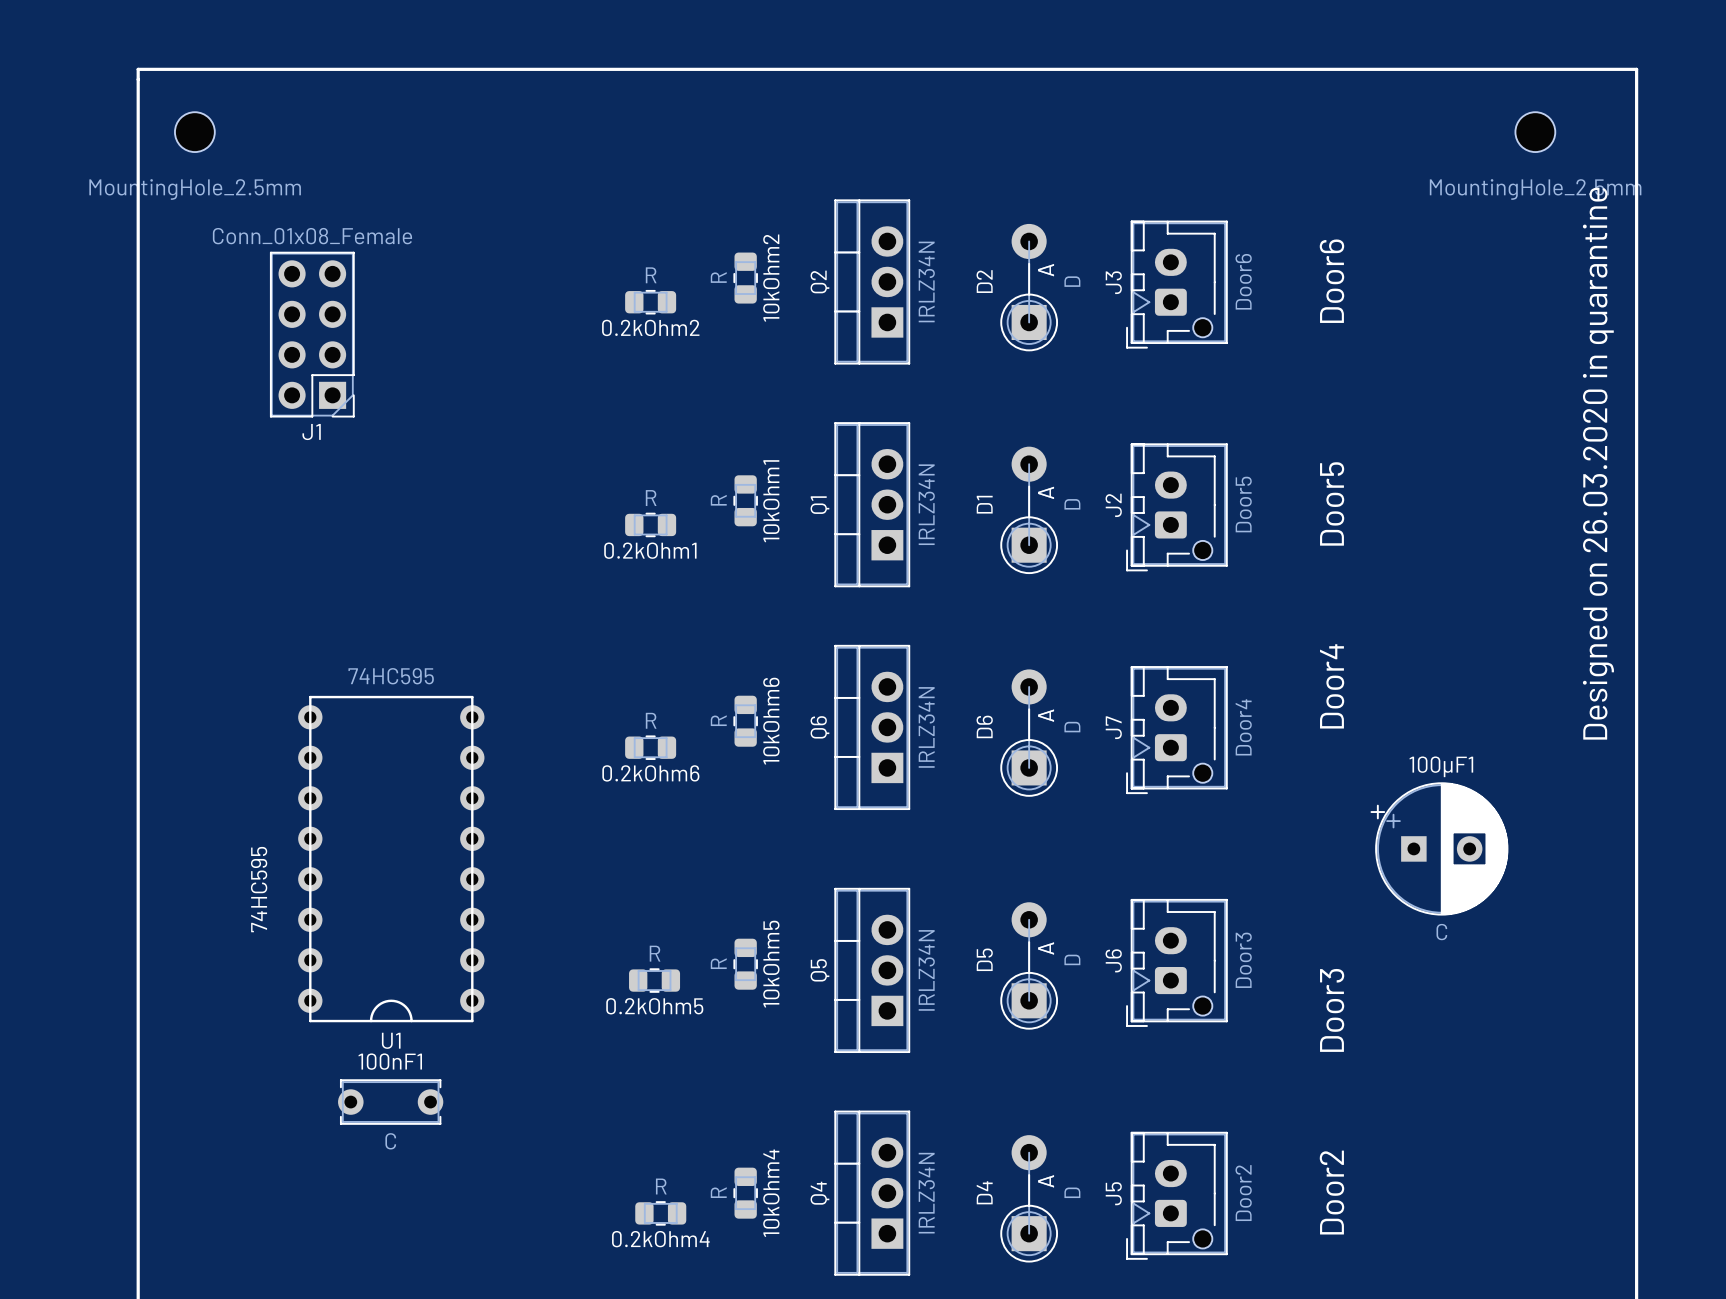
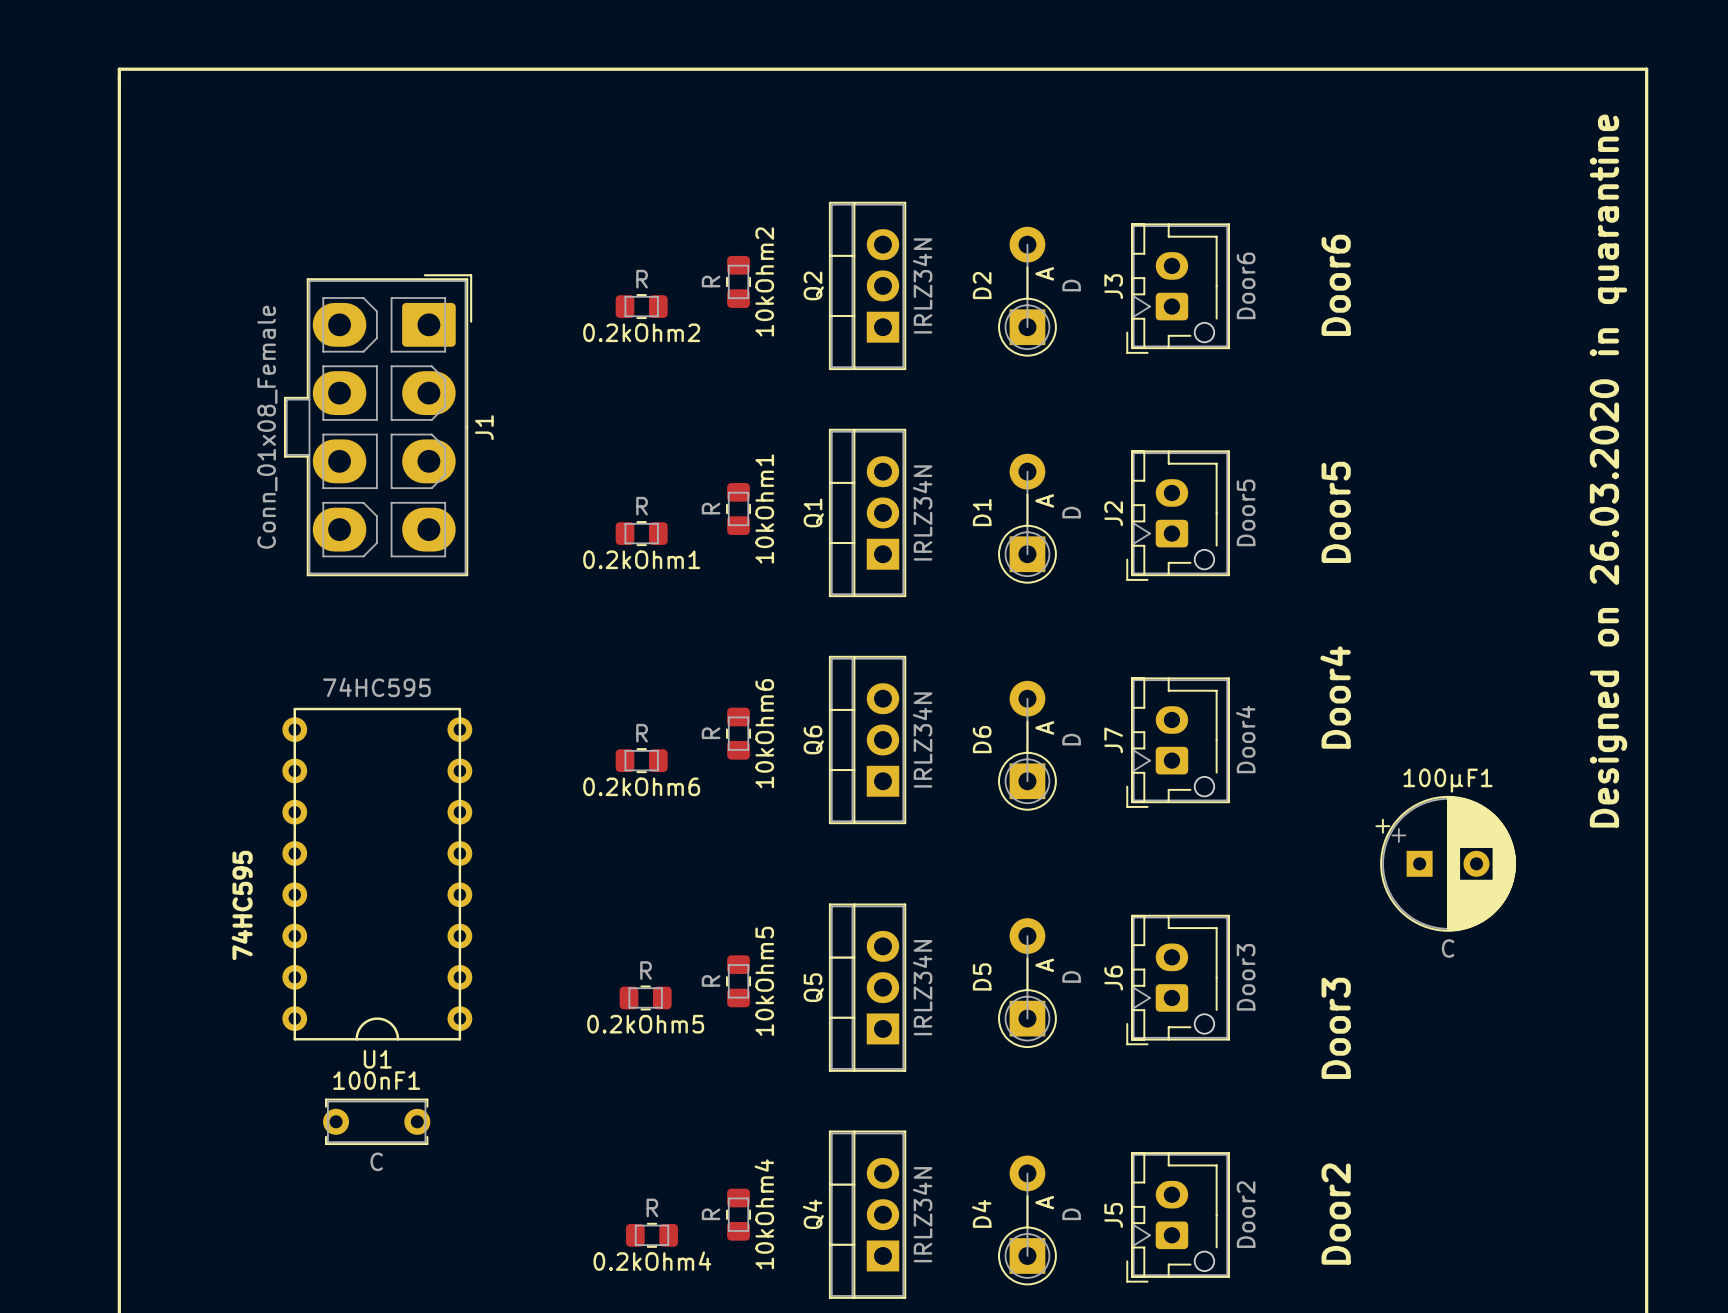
part: MountingHole_2.5mm (194, 132) -> none
part: MountingHole_2.5mm (1535, 132) -> none
J1 value position: Conn_01x08_Female (312, 236) -> Conn_01x08_Female (267, 427)
J1 footprint: [269, 251, 355, 418] -> [283, 274, 473, 577]
J1 name position: J1 (311, 432) -> J1 (484, 427)

